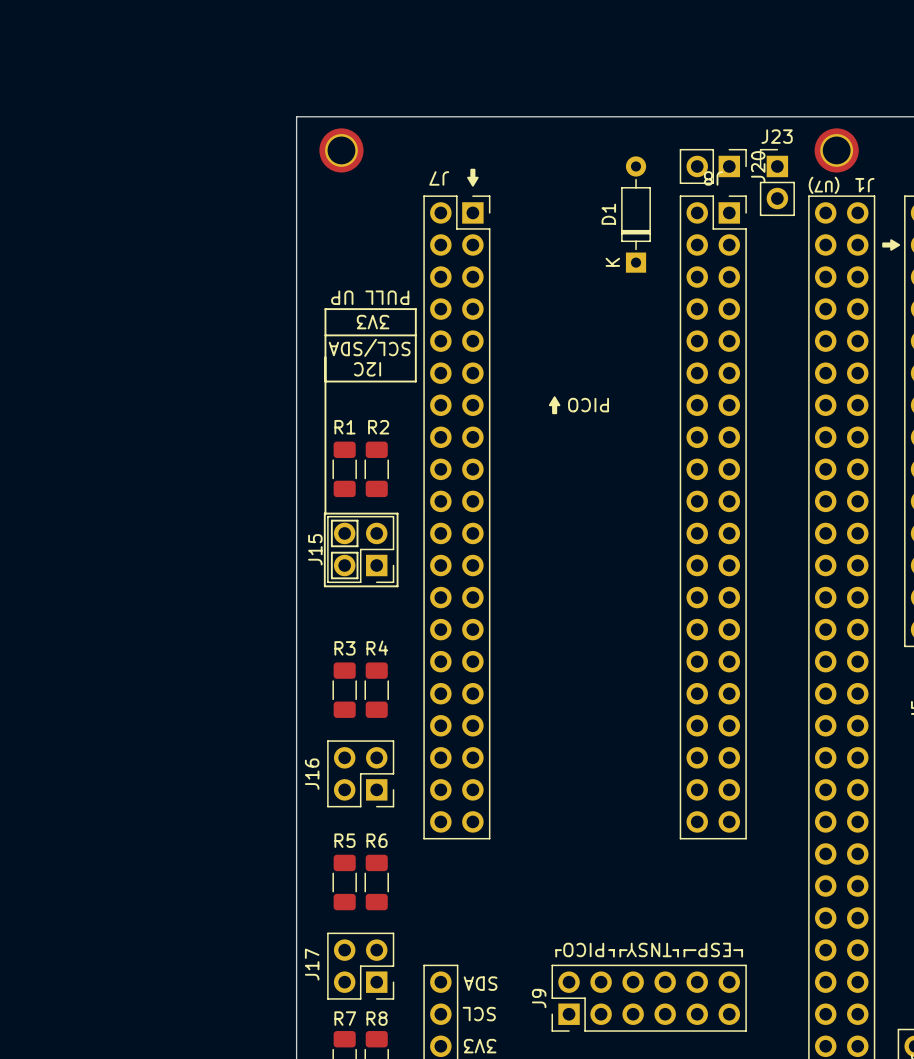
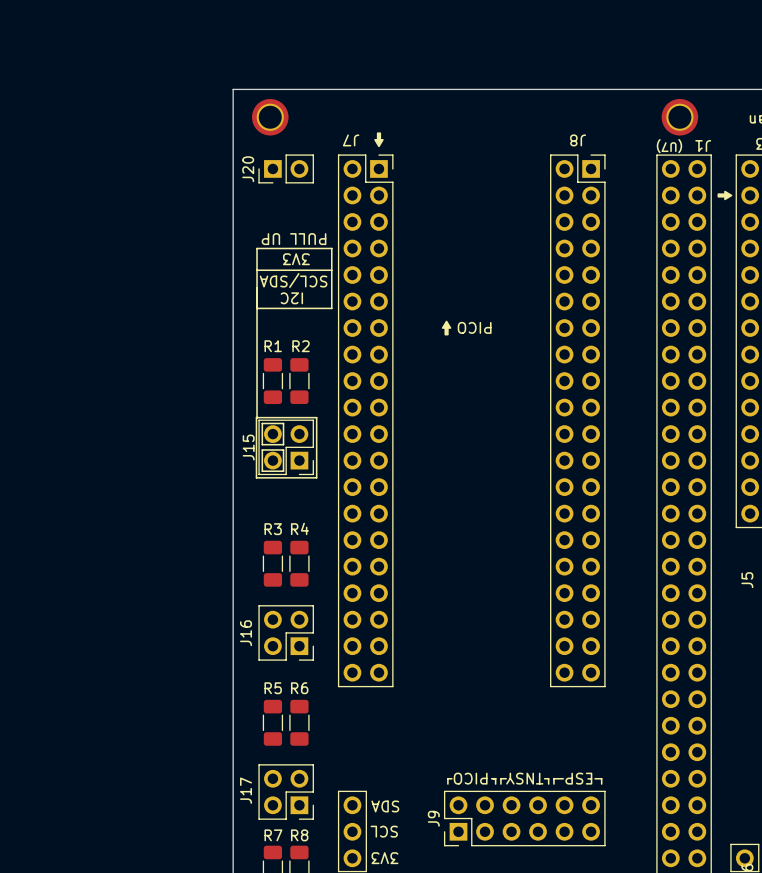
J20 rotation: 0° (713, 166) -> 180° (286, 168)
J20 position: (713, 166) -> (286, 168)
J23: (777, 182) -> none
D1: (636, 214) -> none

